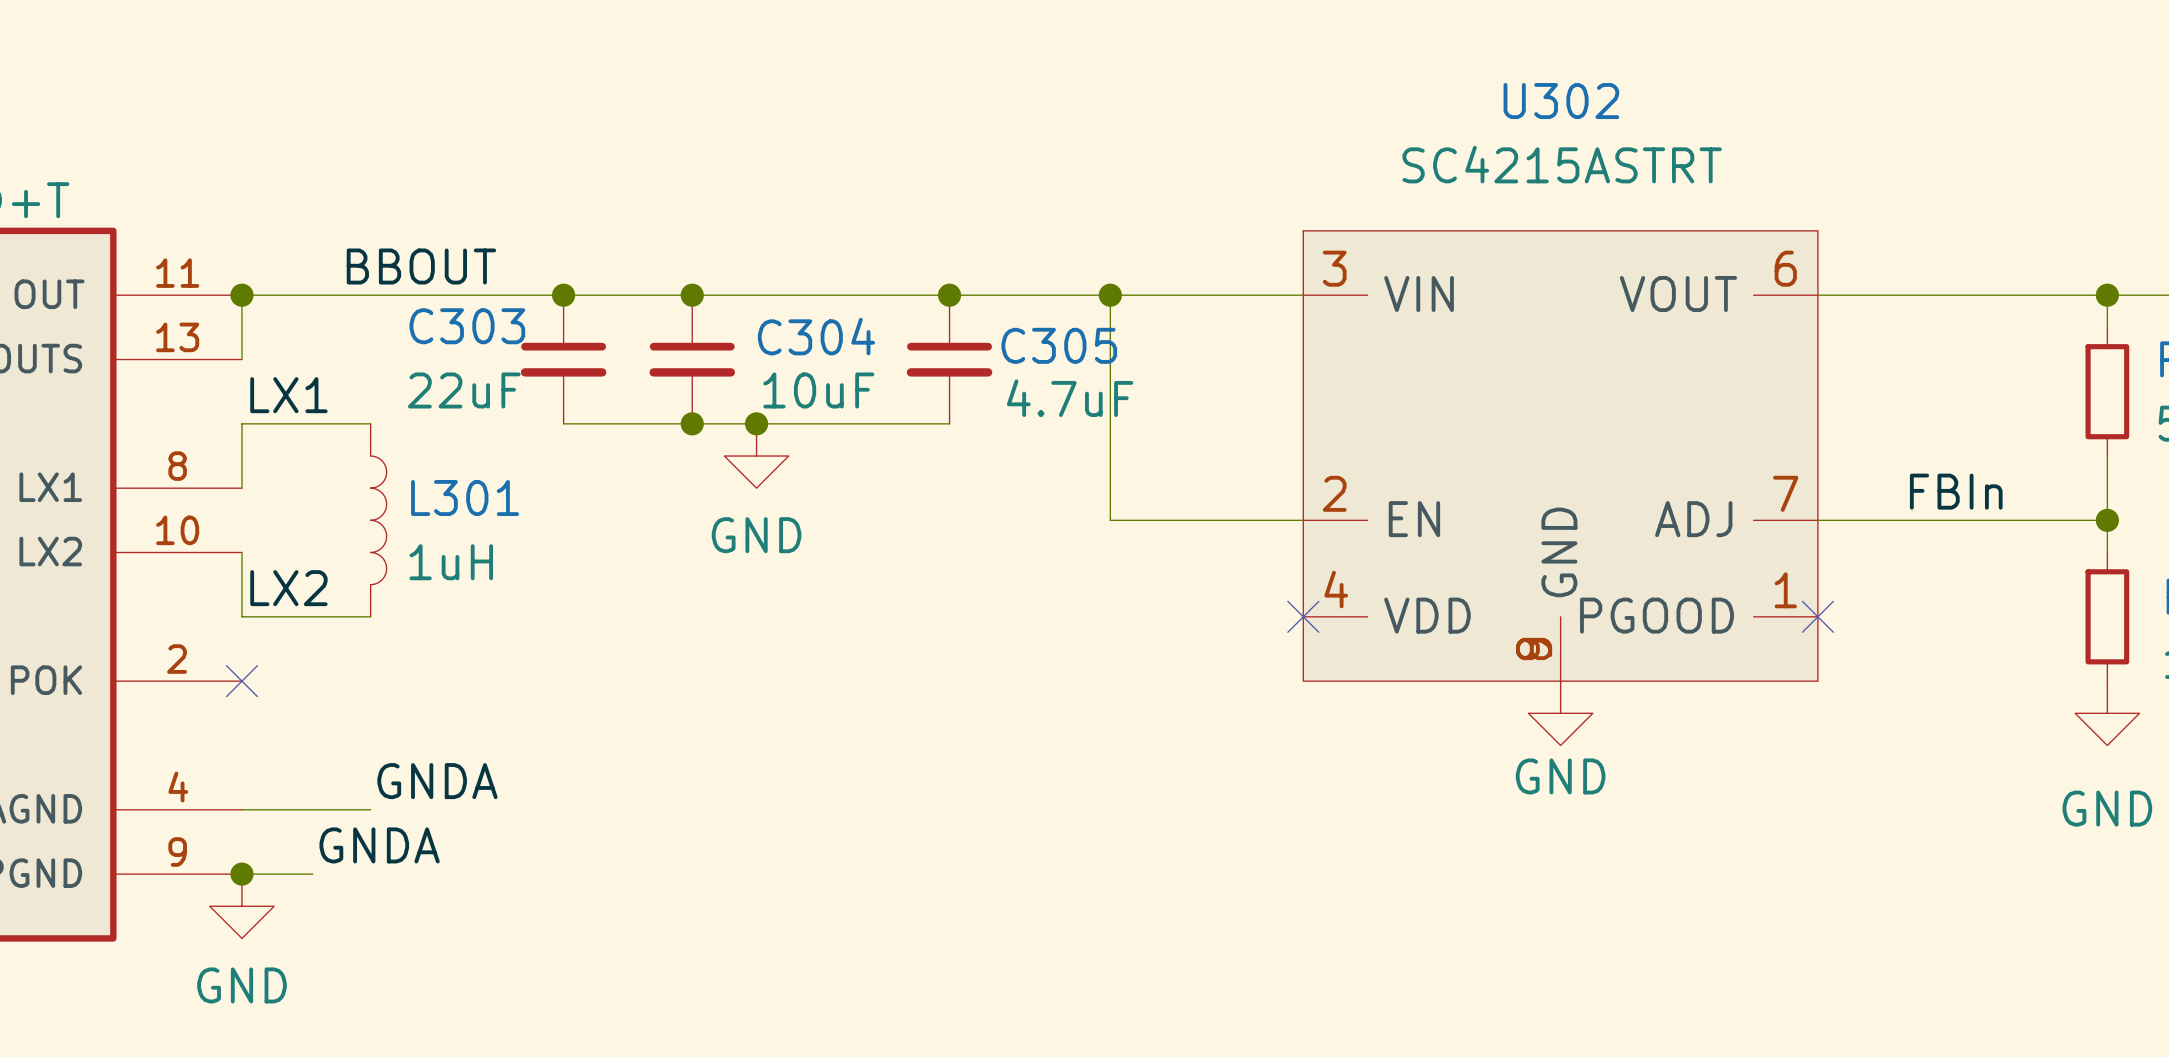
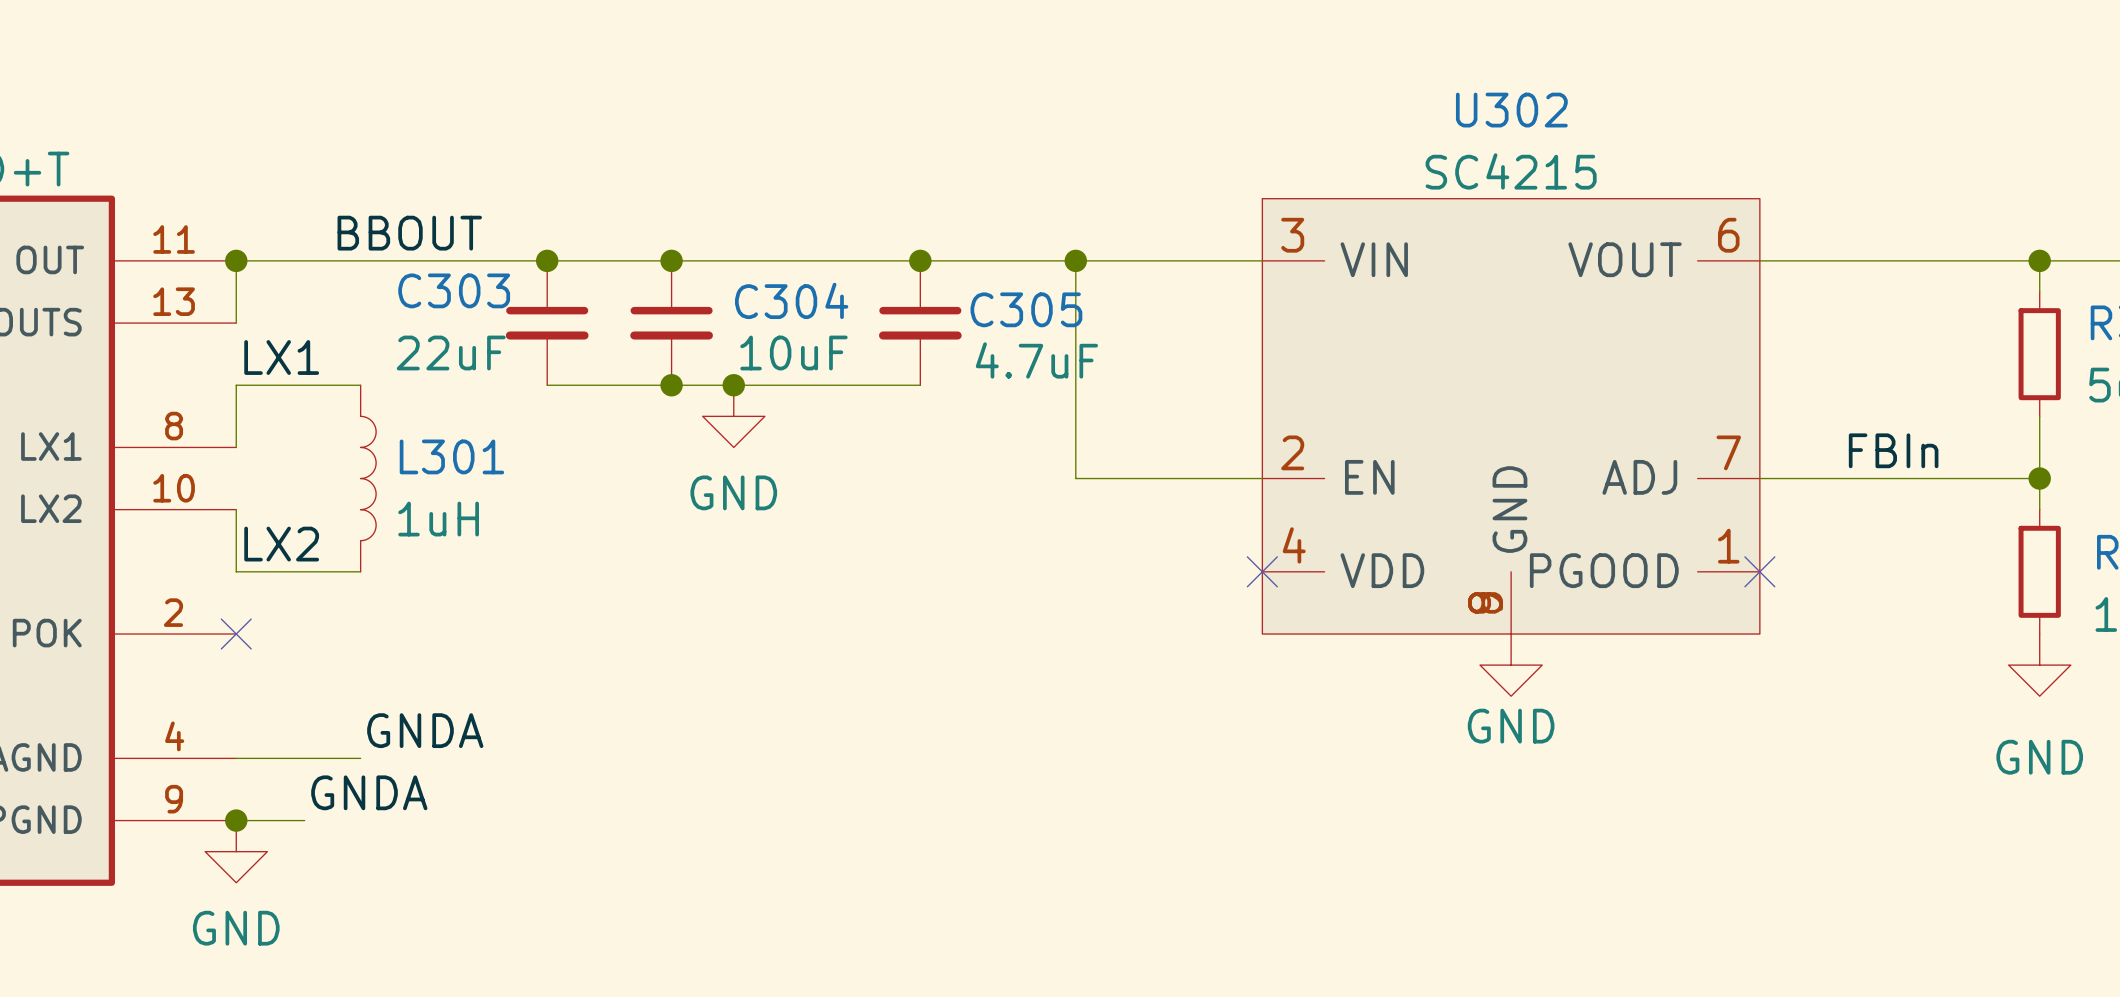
U302 name position: U302 (1561, 101) -> U302 (1511, 110)
U302 value: SC4215ASTRT (1562, 164) -> SC4215 (1511, 171)

